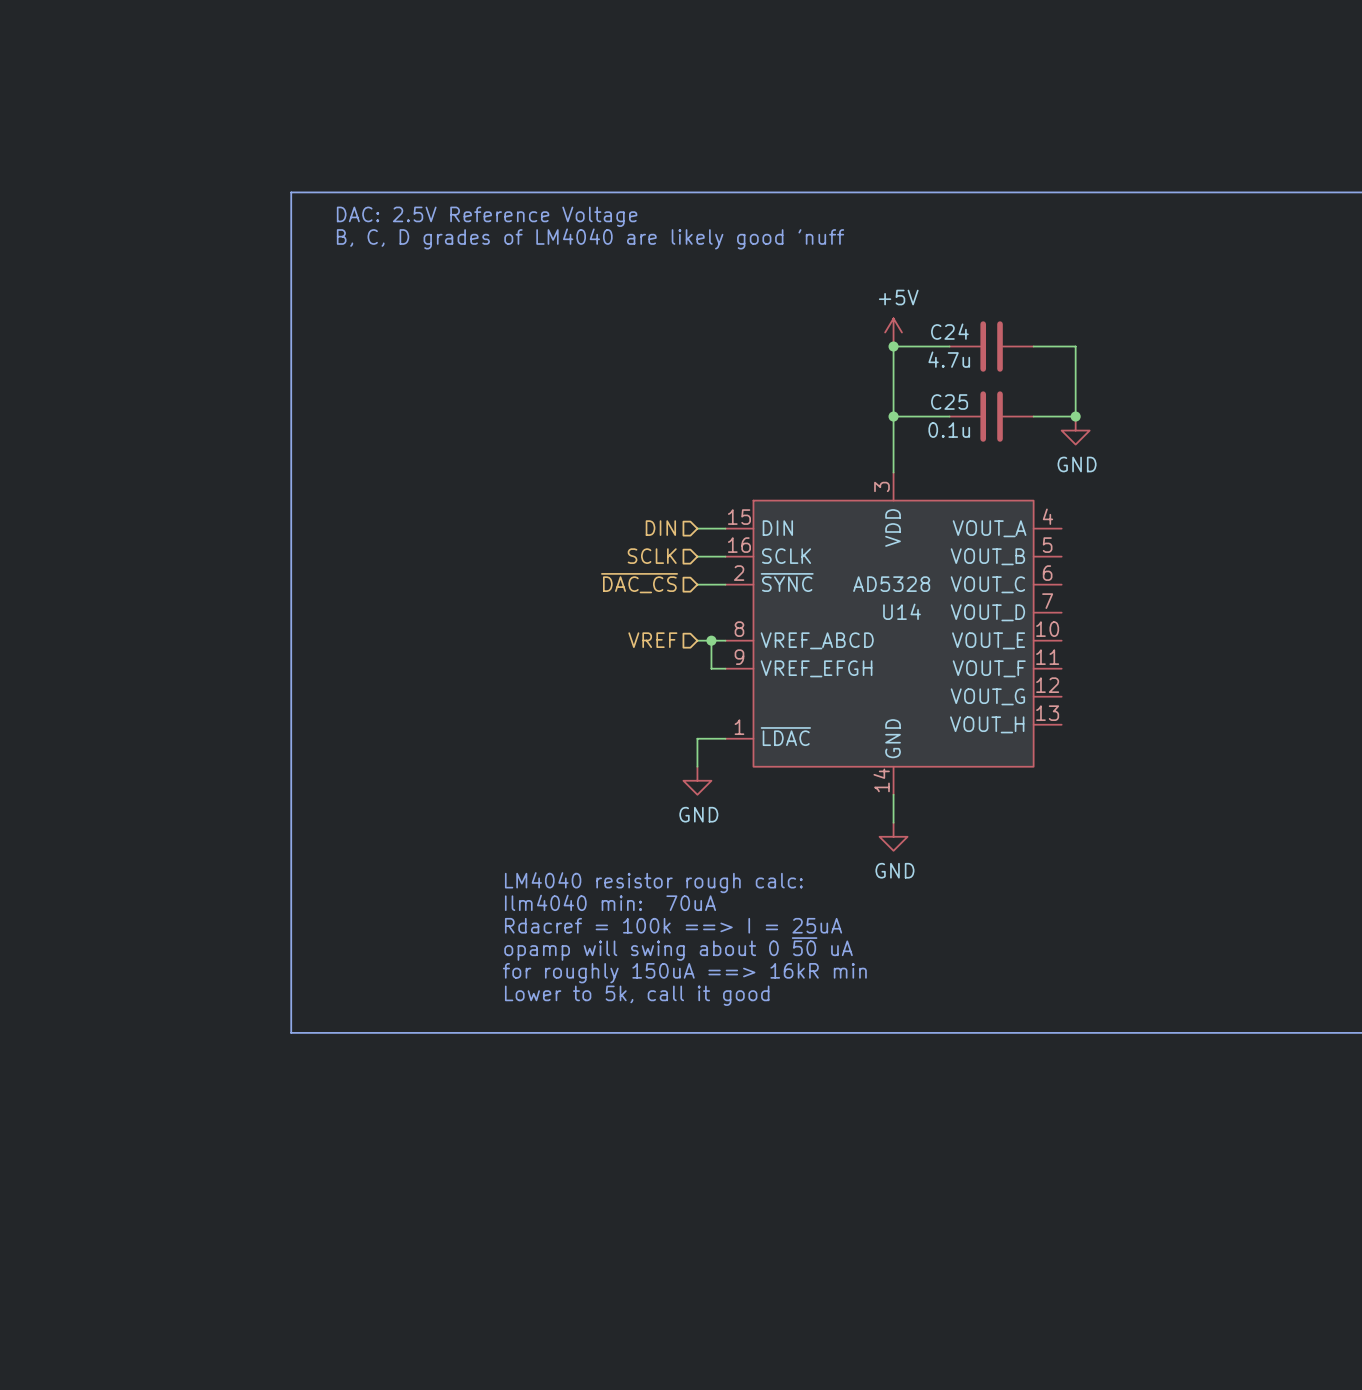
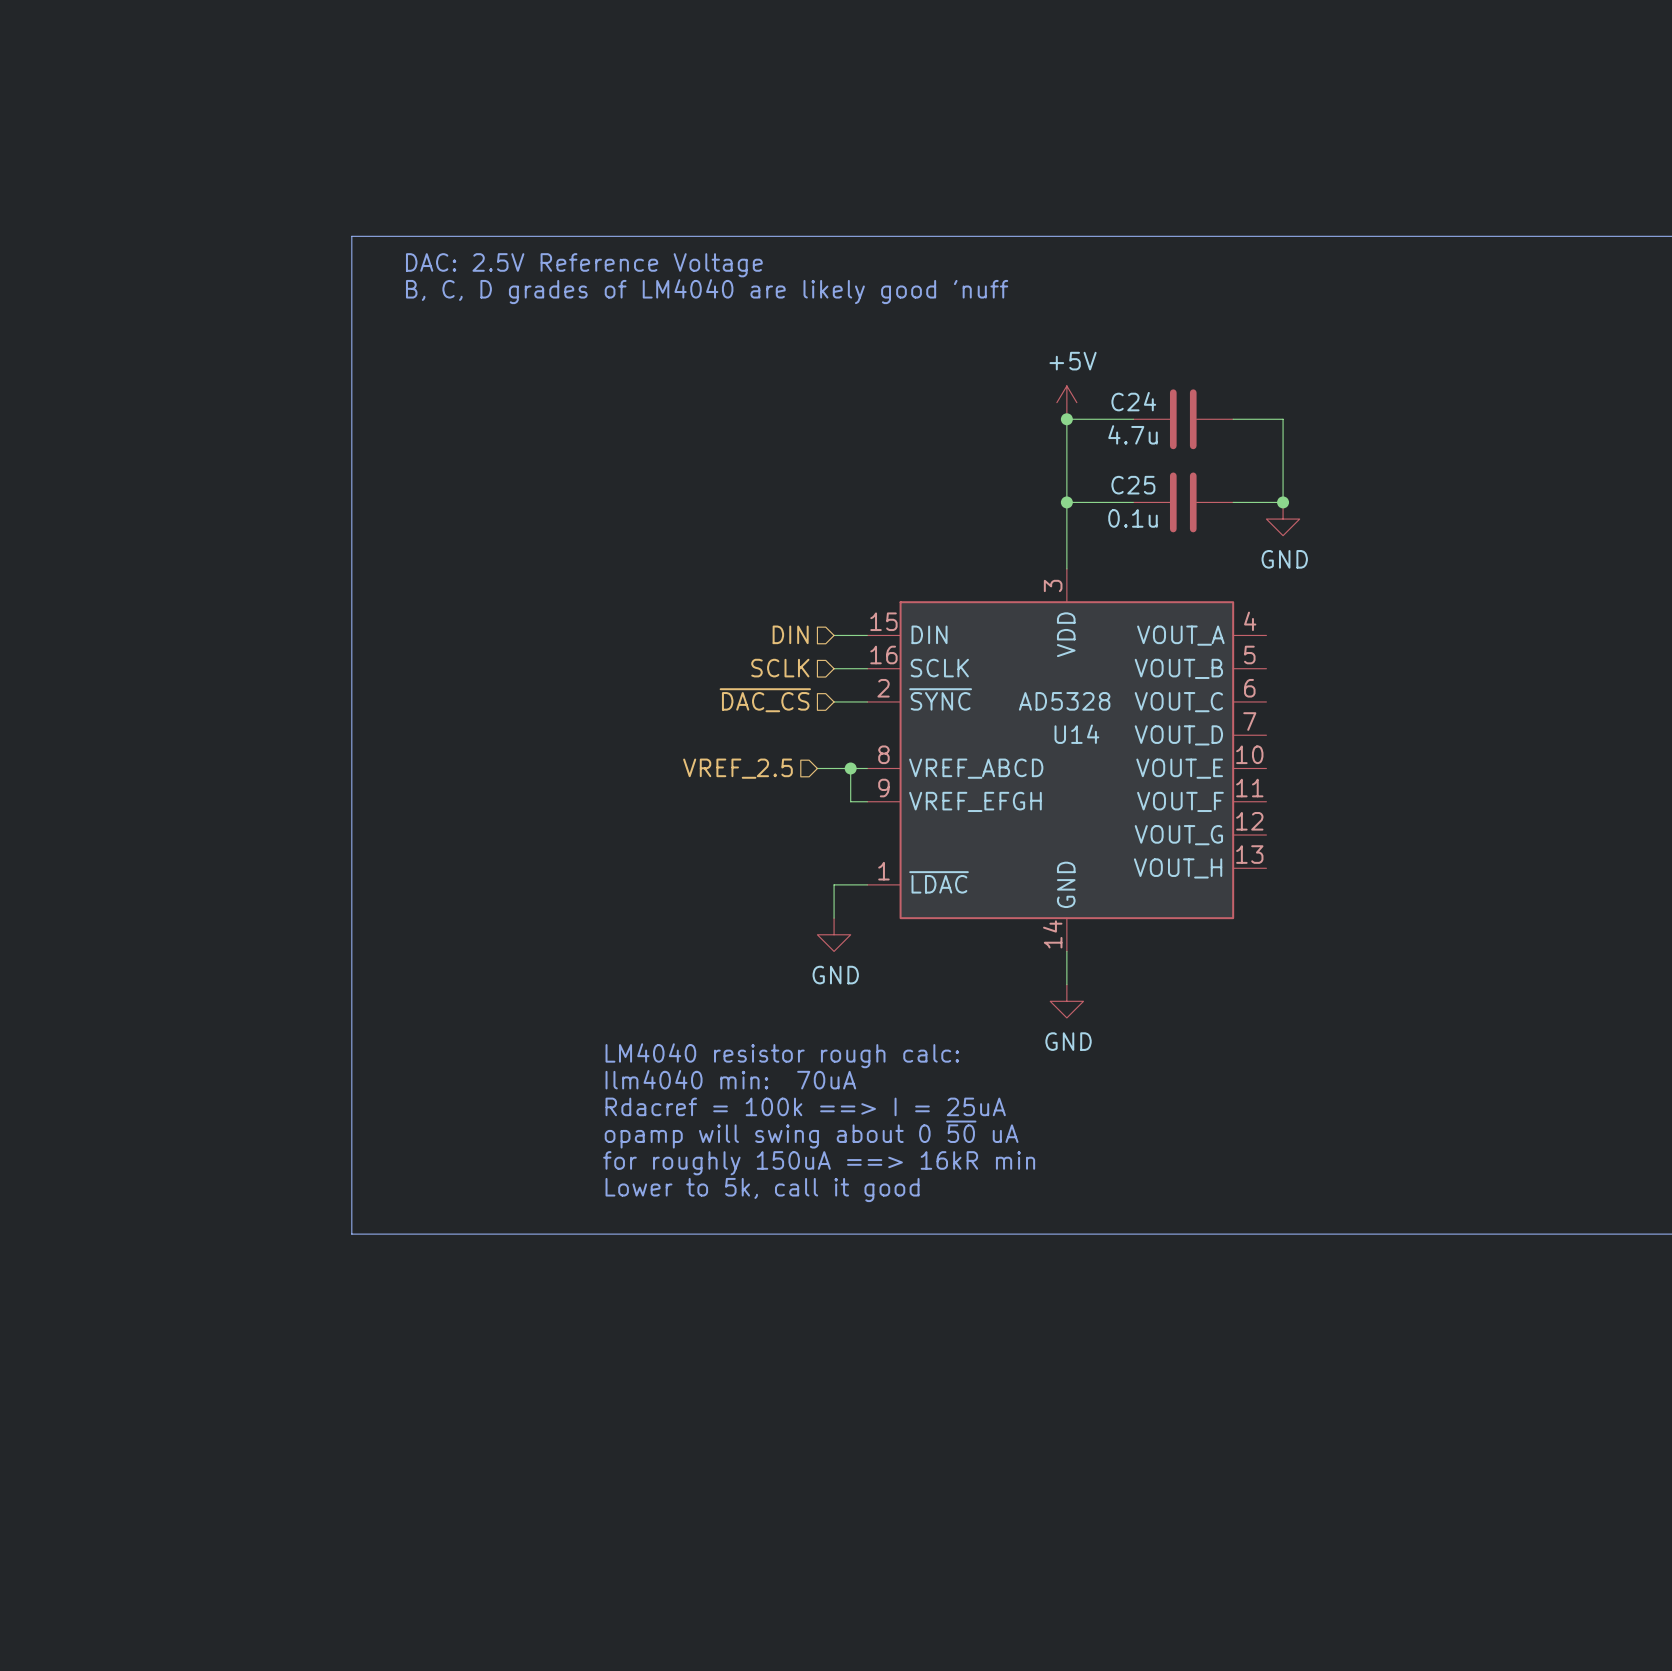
hierarchical label: VREF (652, 640) -> VREF_2.5 (737, 768)
wire: none -> (817, 768) (834, 768)

